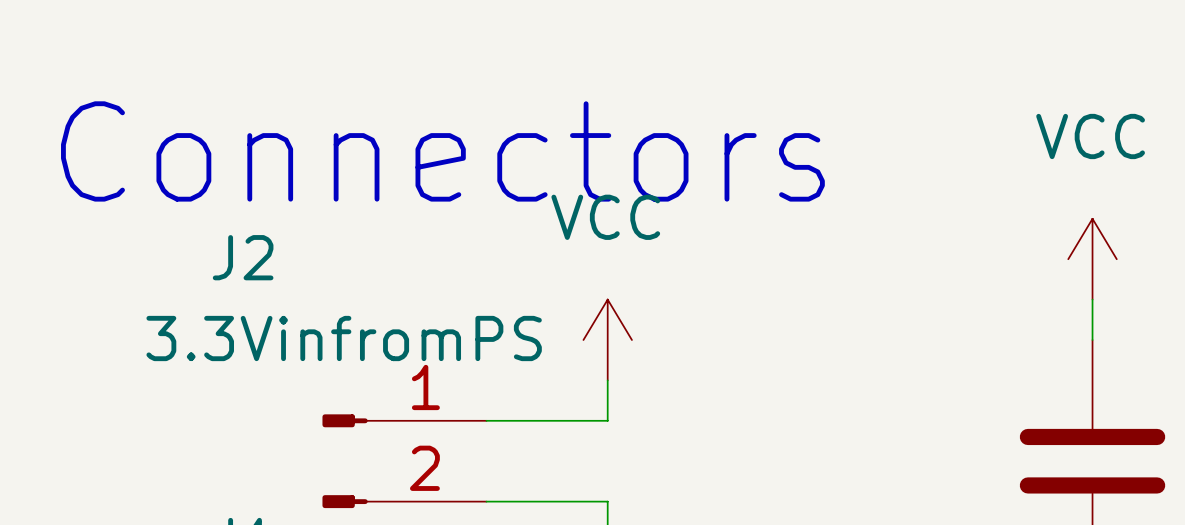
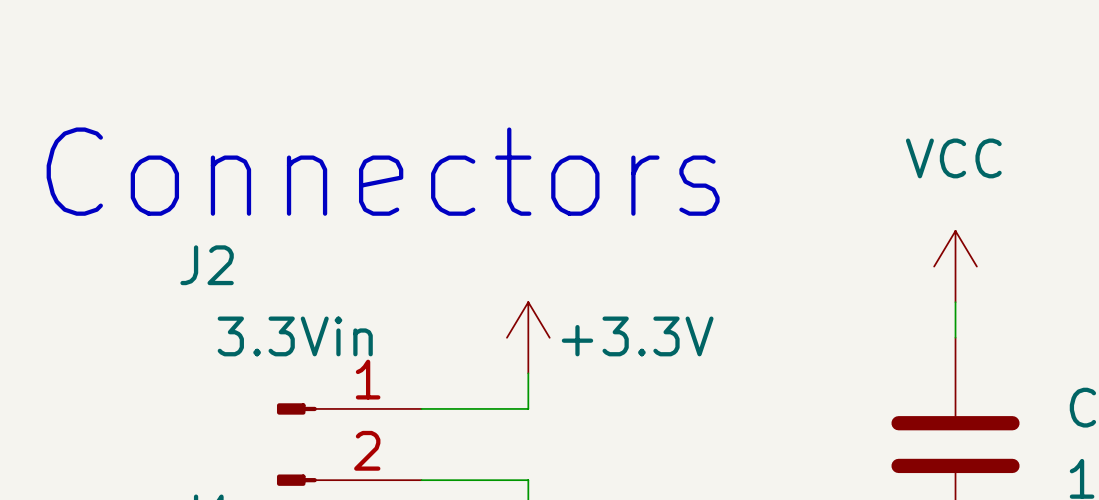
J2 value: 3.3VinfromPS (344, 338) -> 3.3Vin (295, 336)
power symbol: VCC (607, 340) -> +3.3V (528, 337)

